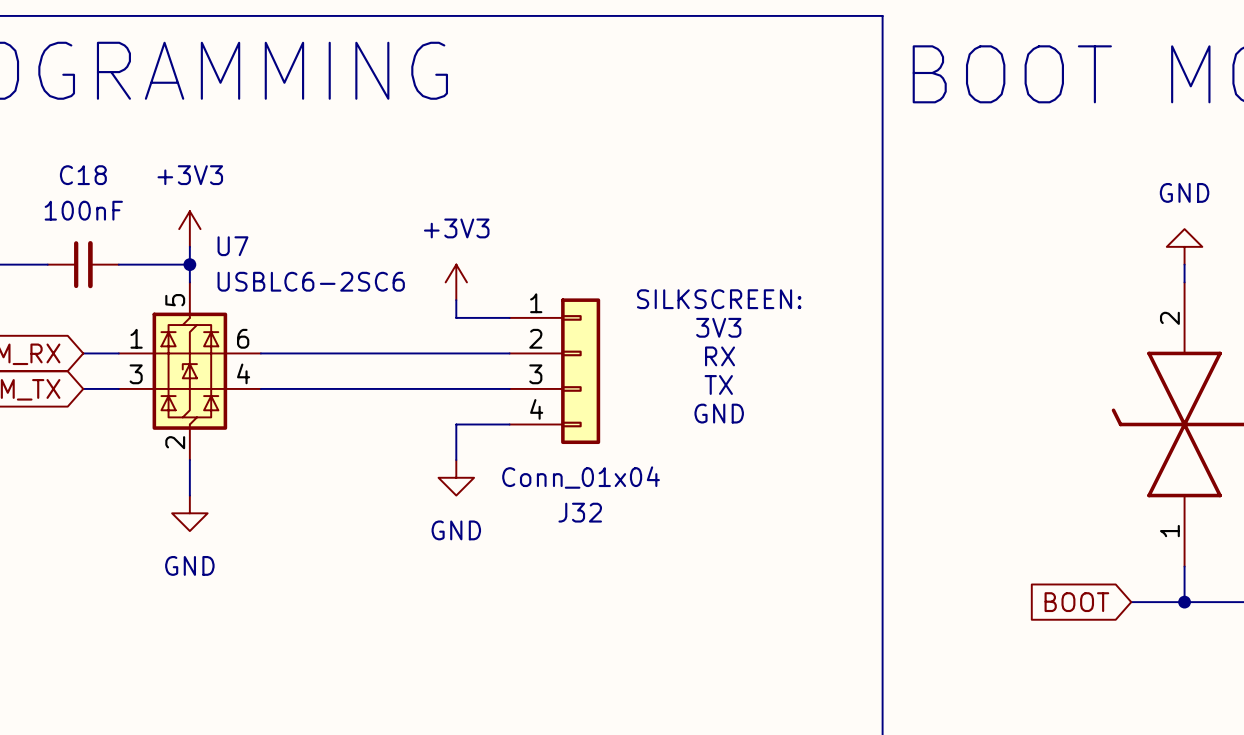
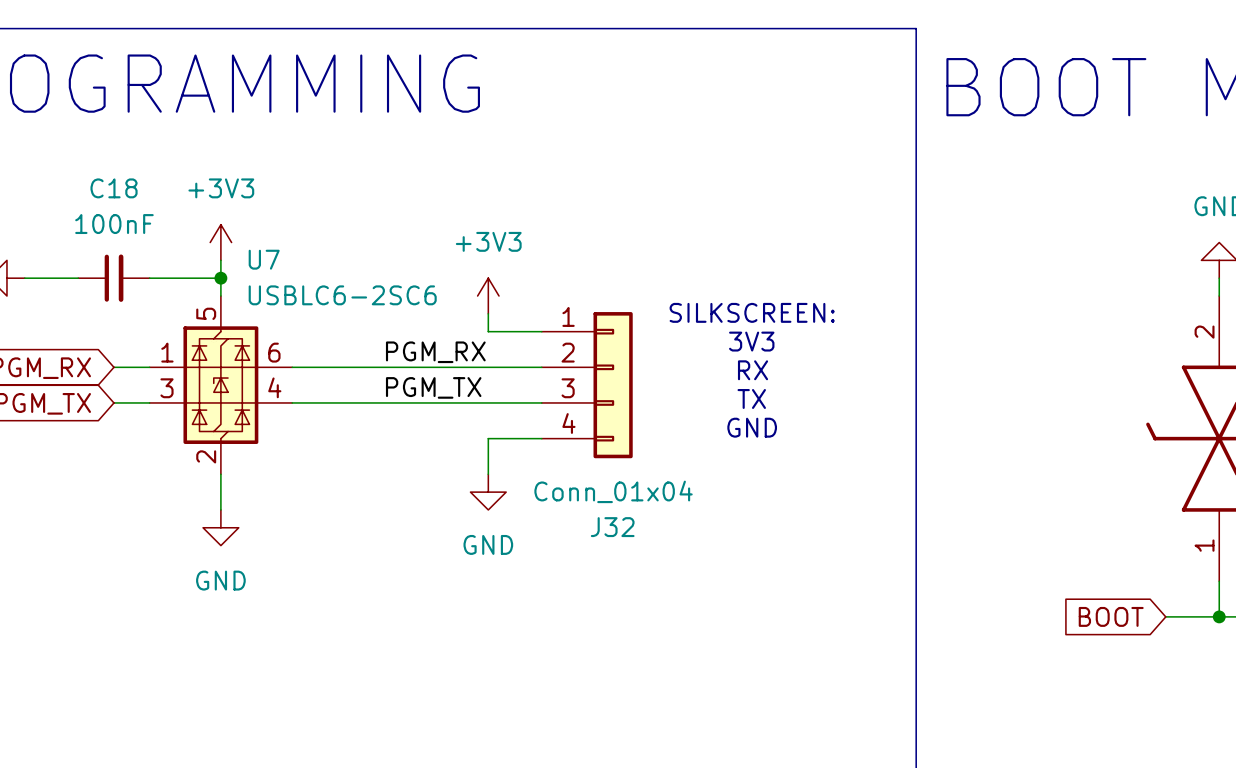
label: none -> PGM_RX (435, 352)
label: none -> PGM_TX (433, 387)

